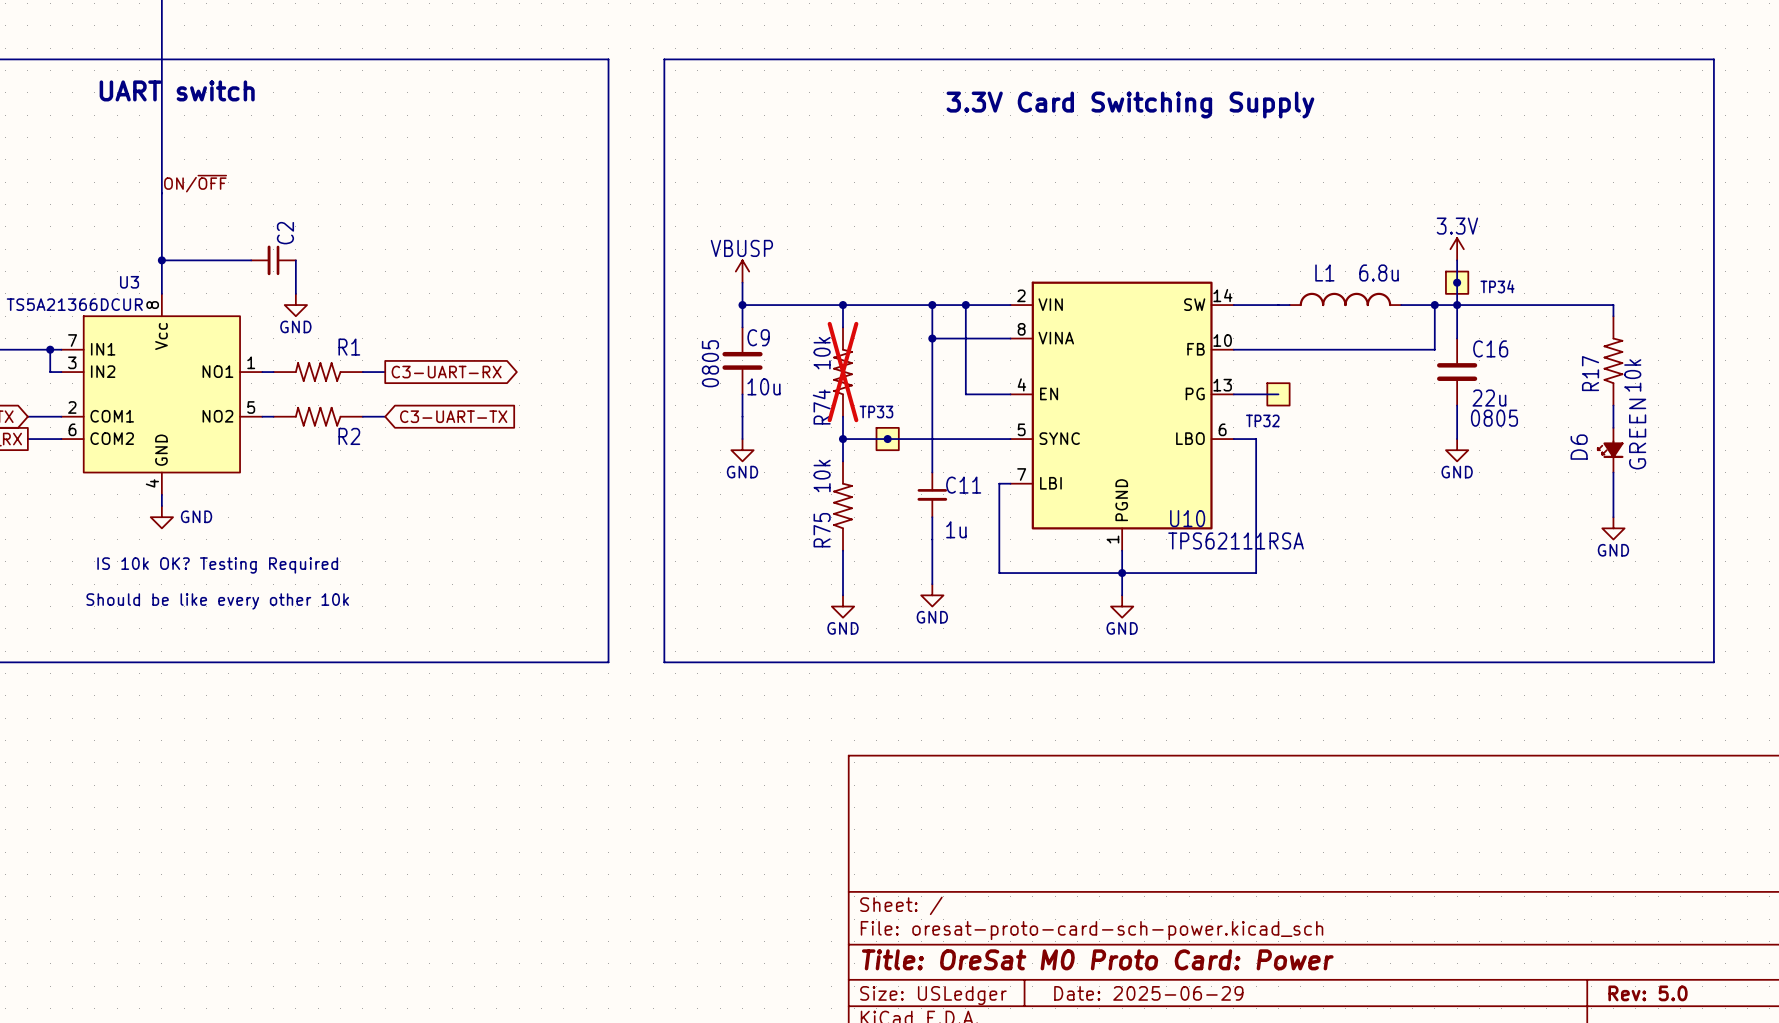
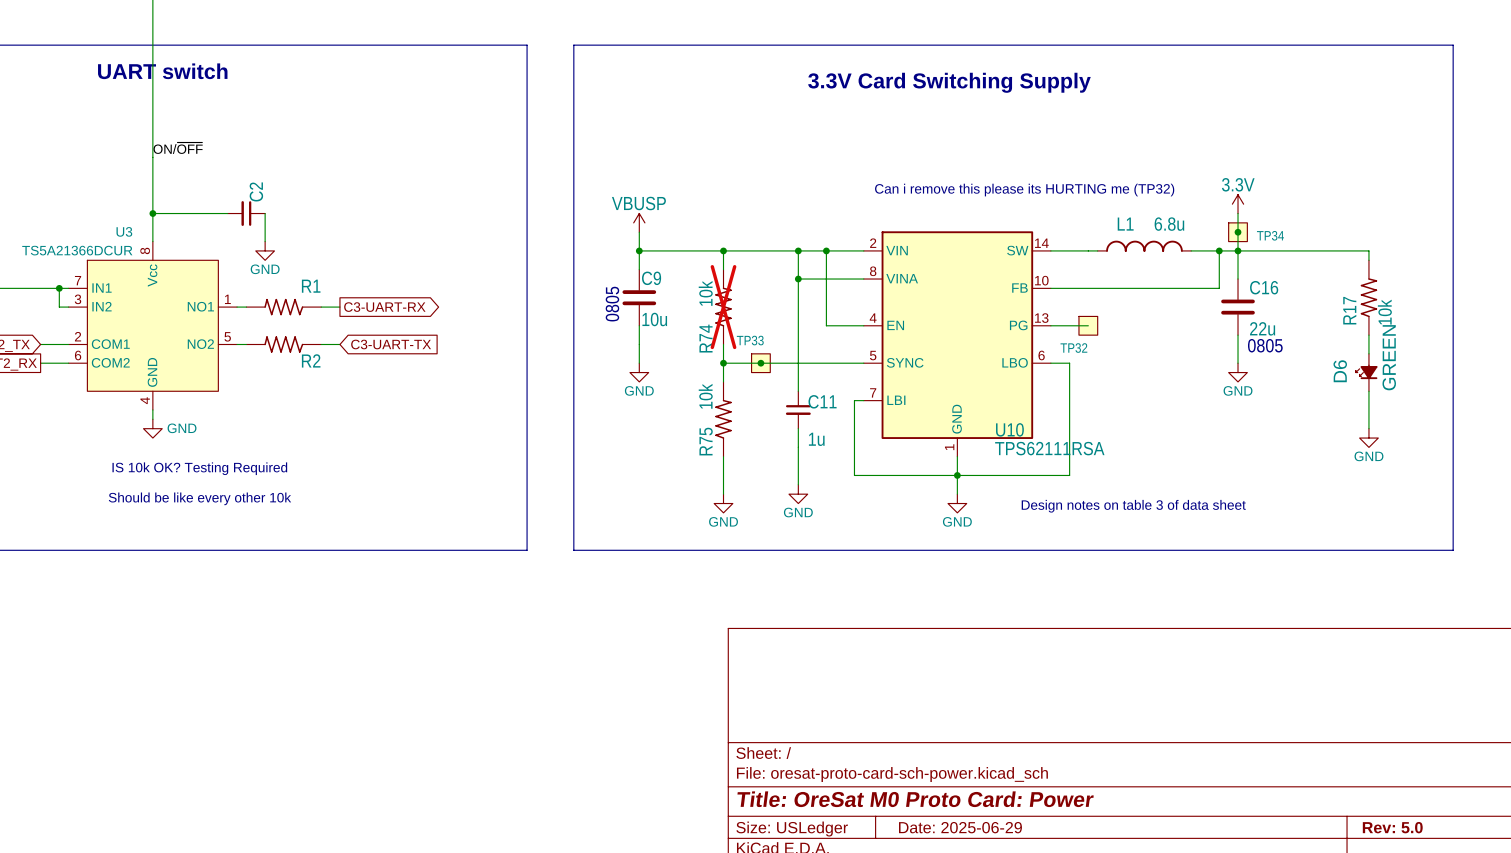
text: none -> Can i remove this please its HURTING me (TP32) (1024, 190)
U10 pin name: PGND (1121, 500) -> GND (957, 419)
text: none -> Design notes on table 3 of data sheet (1133, 506)

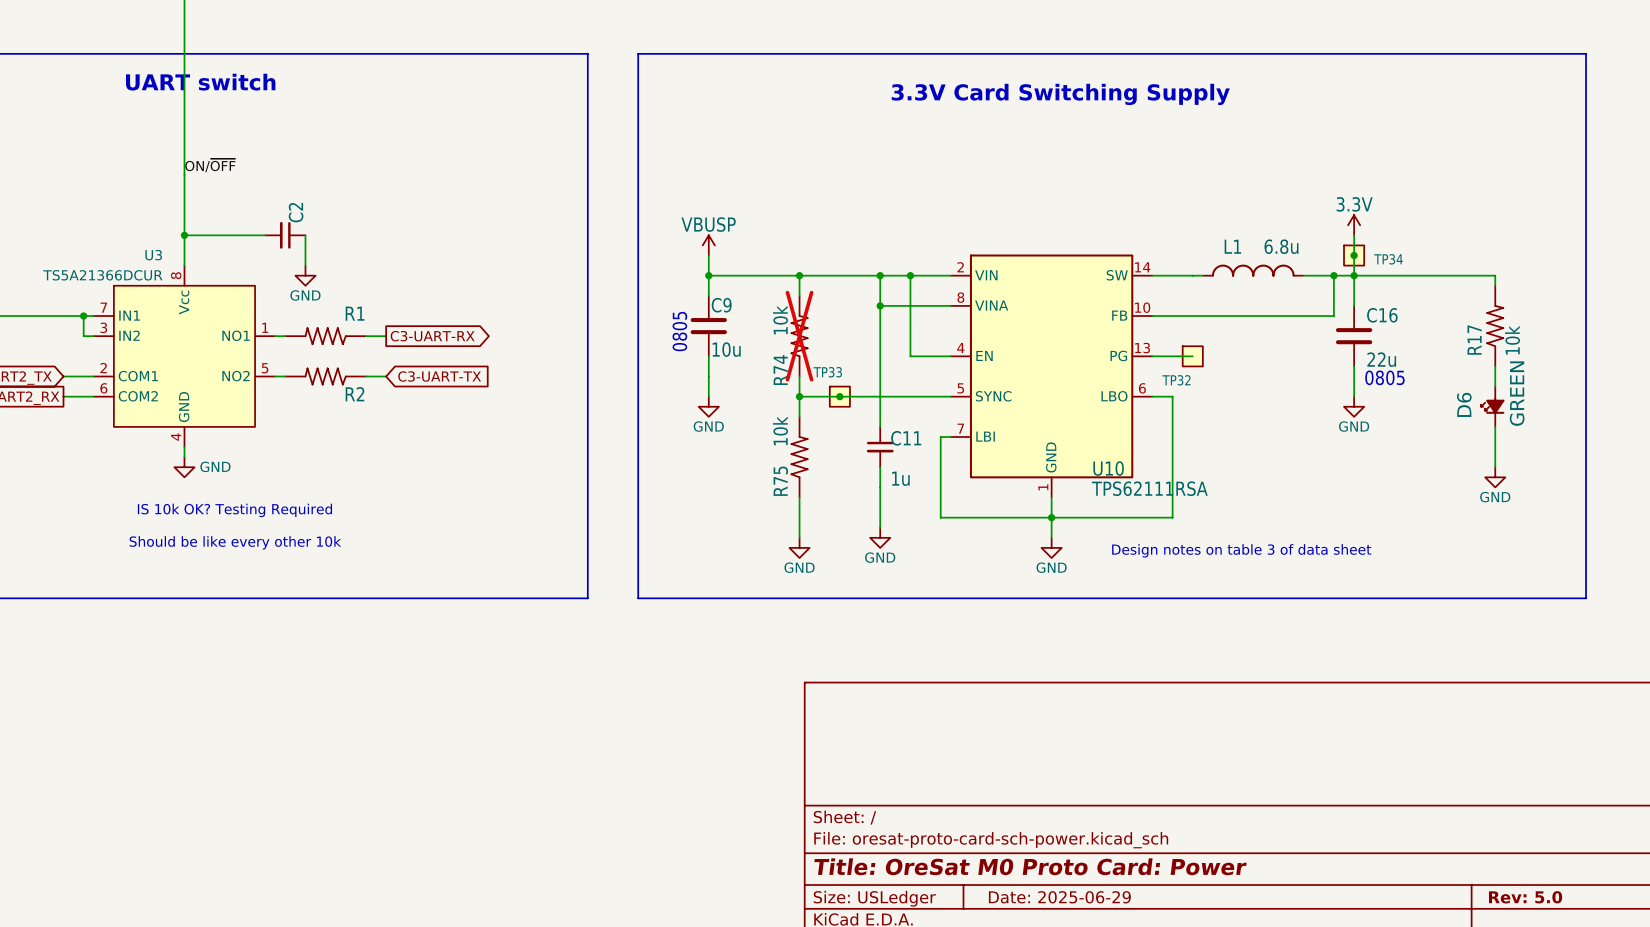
text: Can i remove this please its HURTING me (TP32) (1024, 190) -> none

